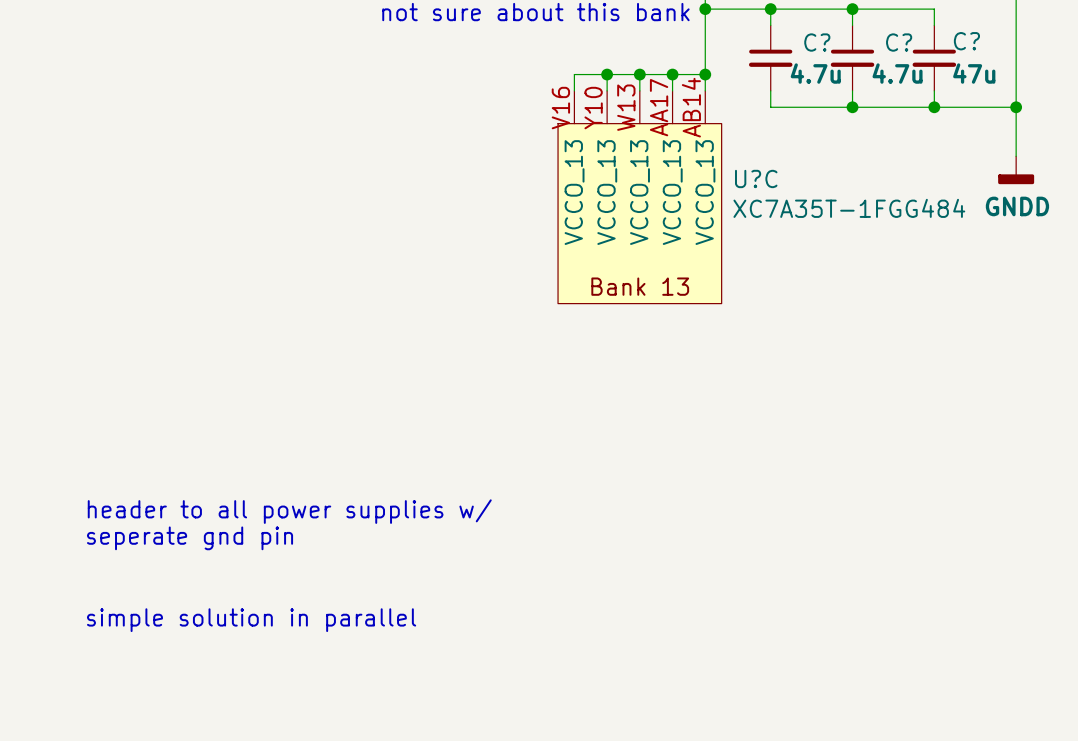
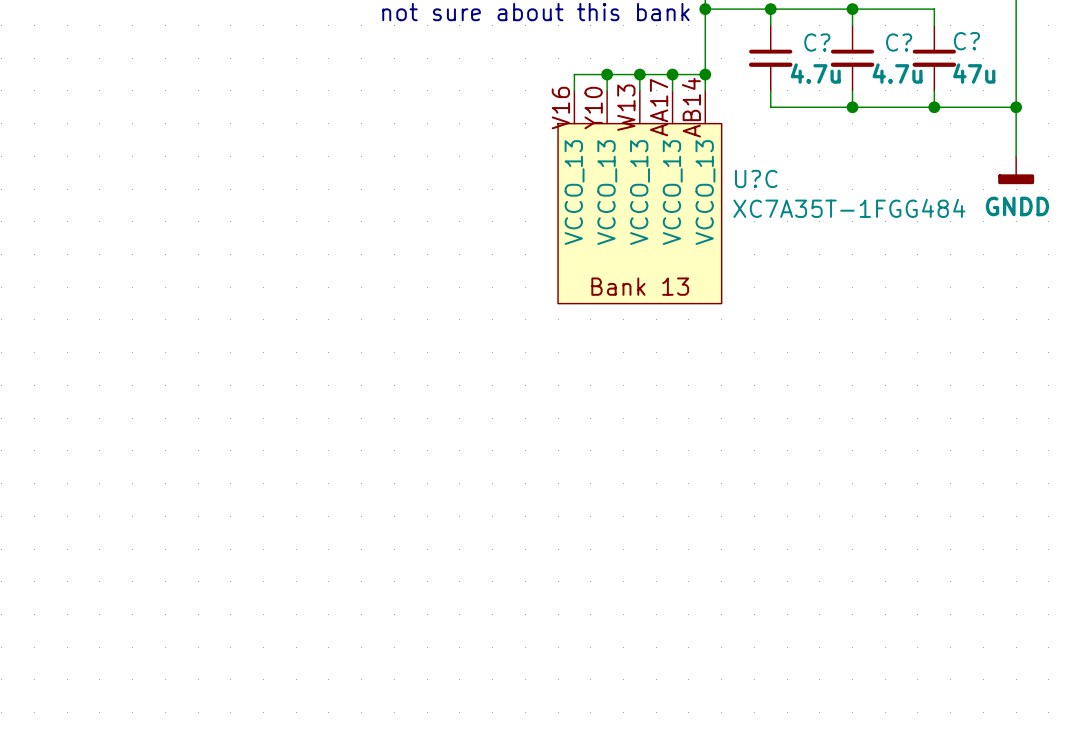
text: header to all power supplies w/ (289, 511) -> none
text: seperate gnd pin (190, 538) -> none
text: simple solution in parallel (251, 620) -> none

